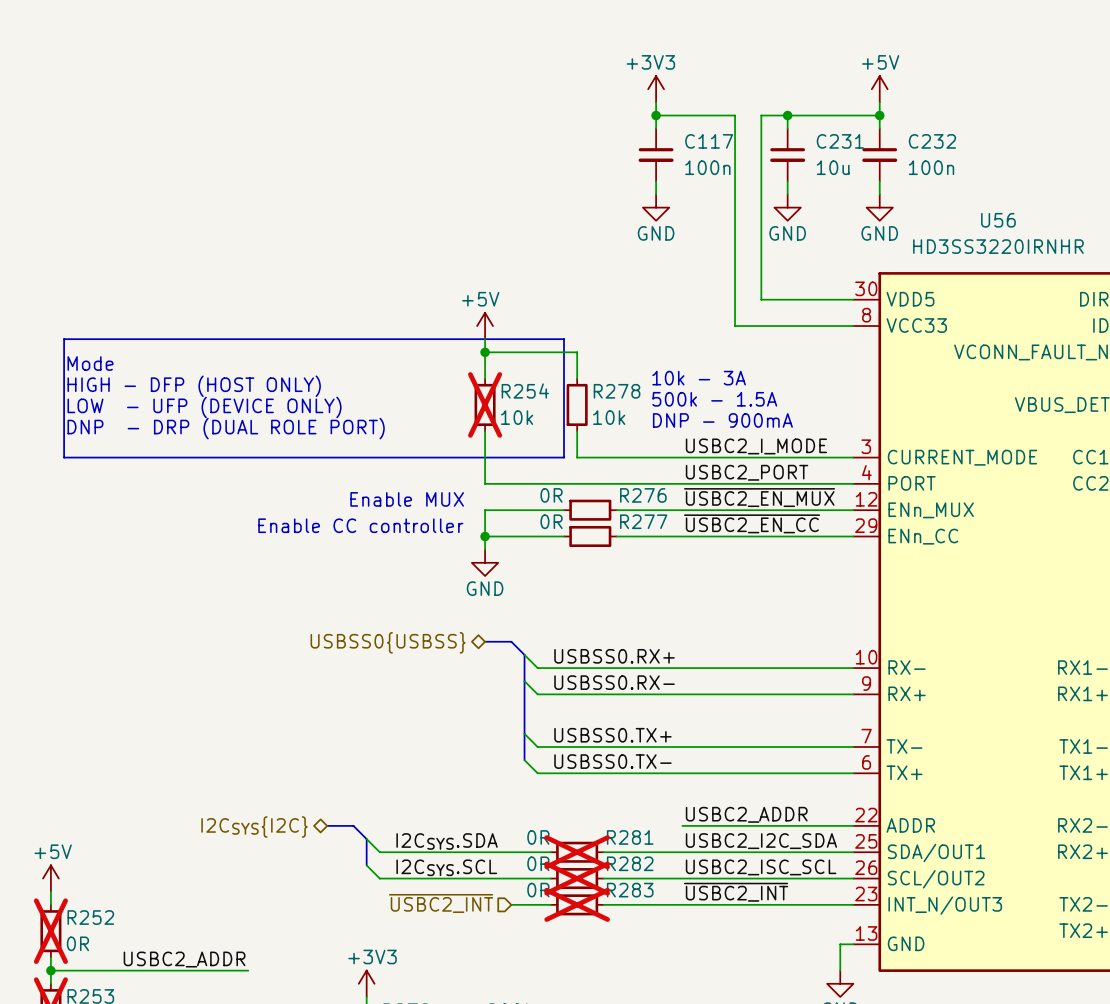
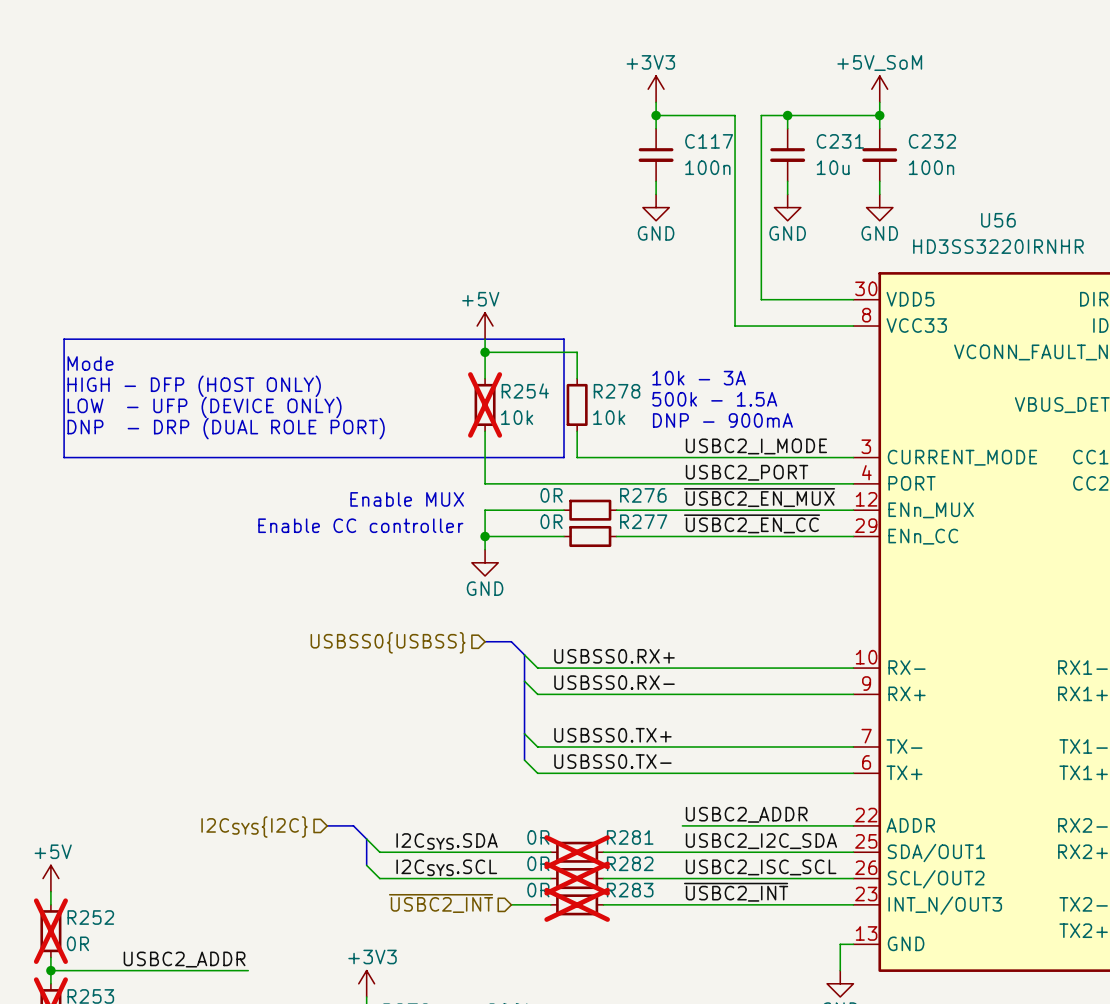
power symbol: +5V (879, 89) -> +5V_SoM (879, 89)
hierarchical label shape: bidirectional (388, 642) -> input (388, 642)
hierarchical label shape: bidirectional (254, 827) -> input (254, 827)

